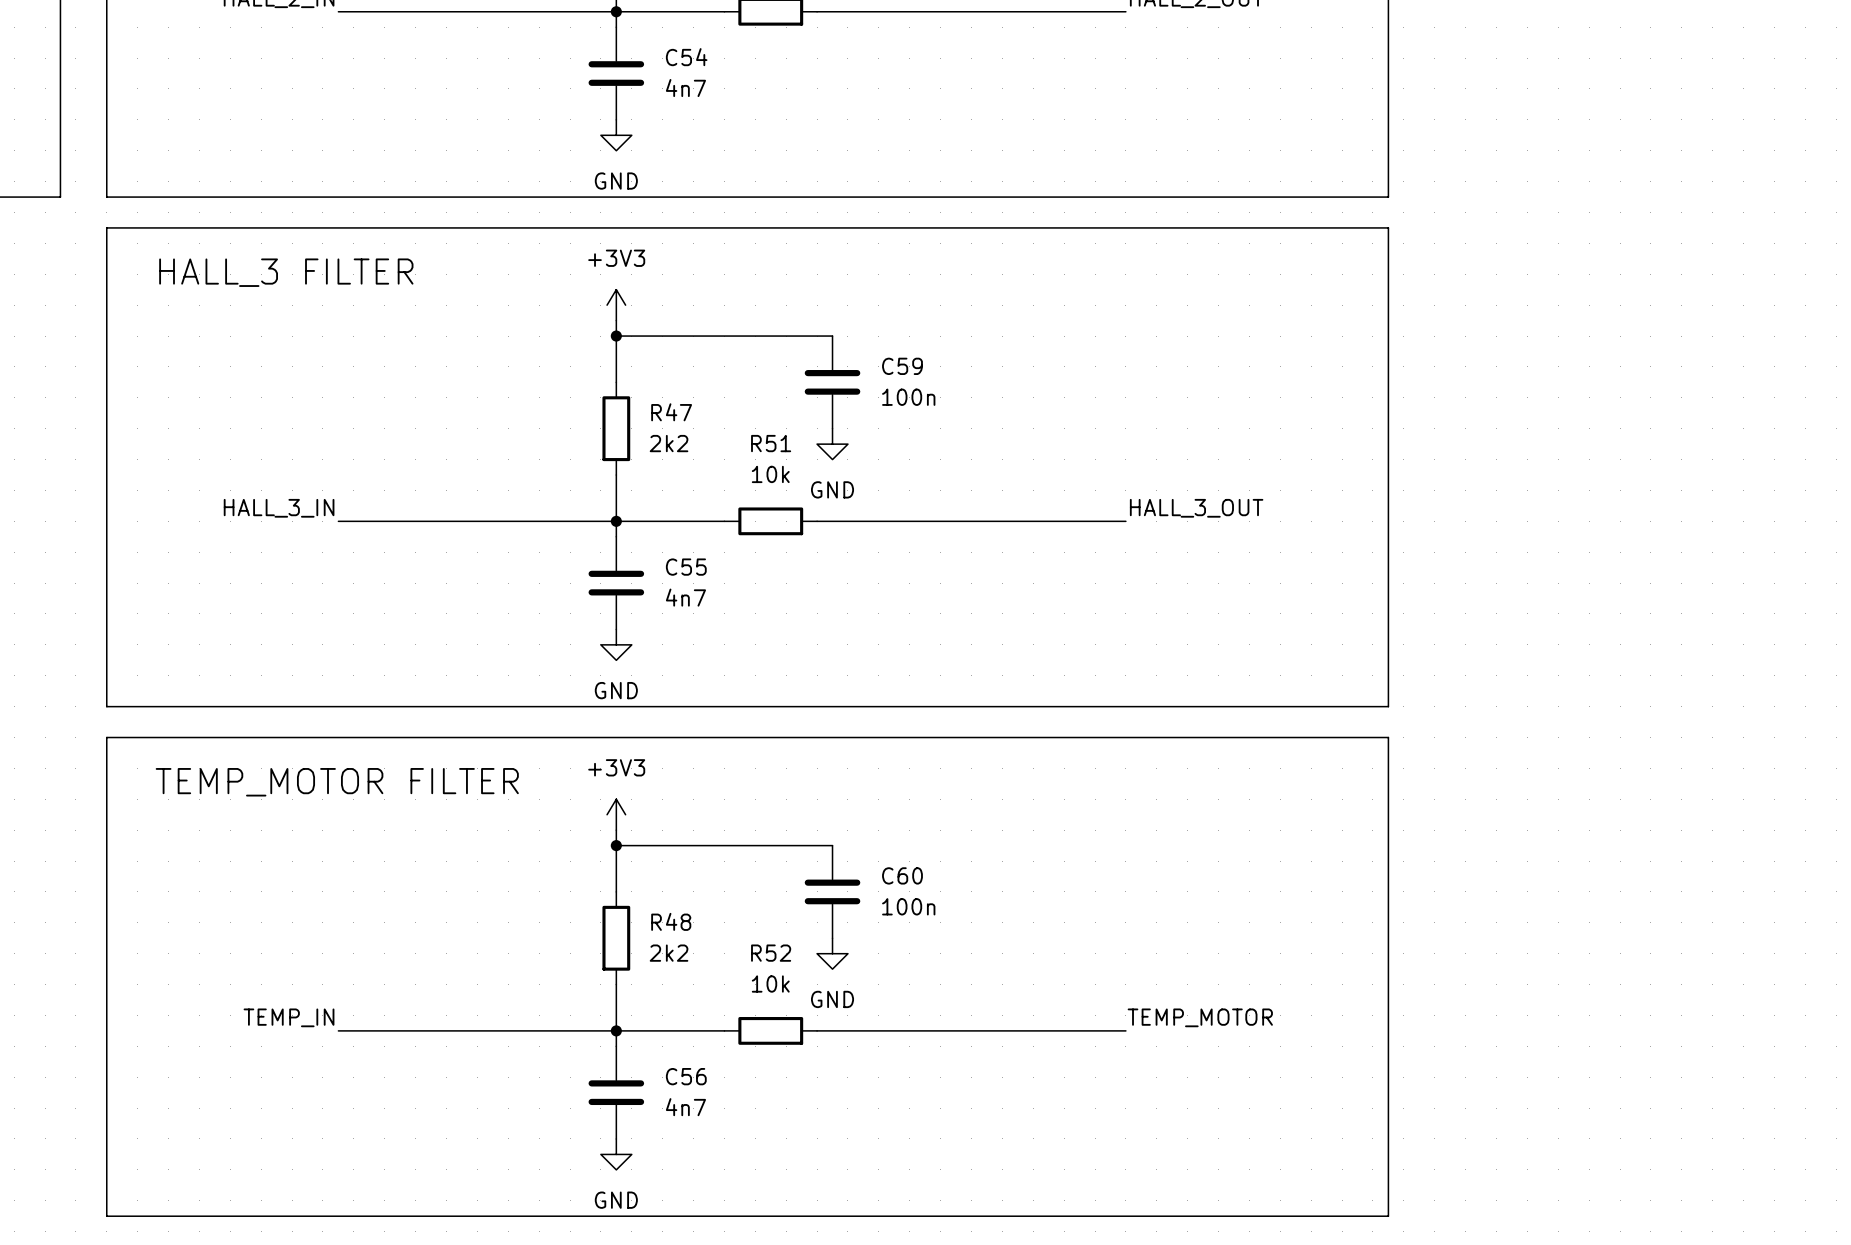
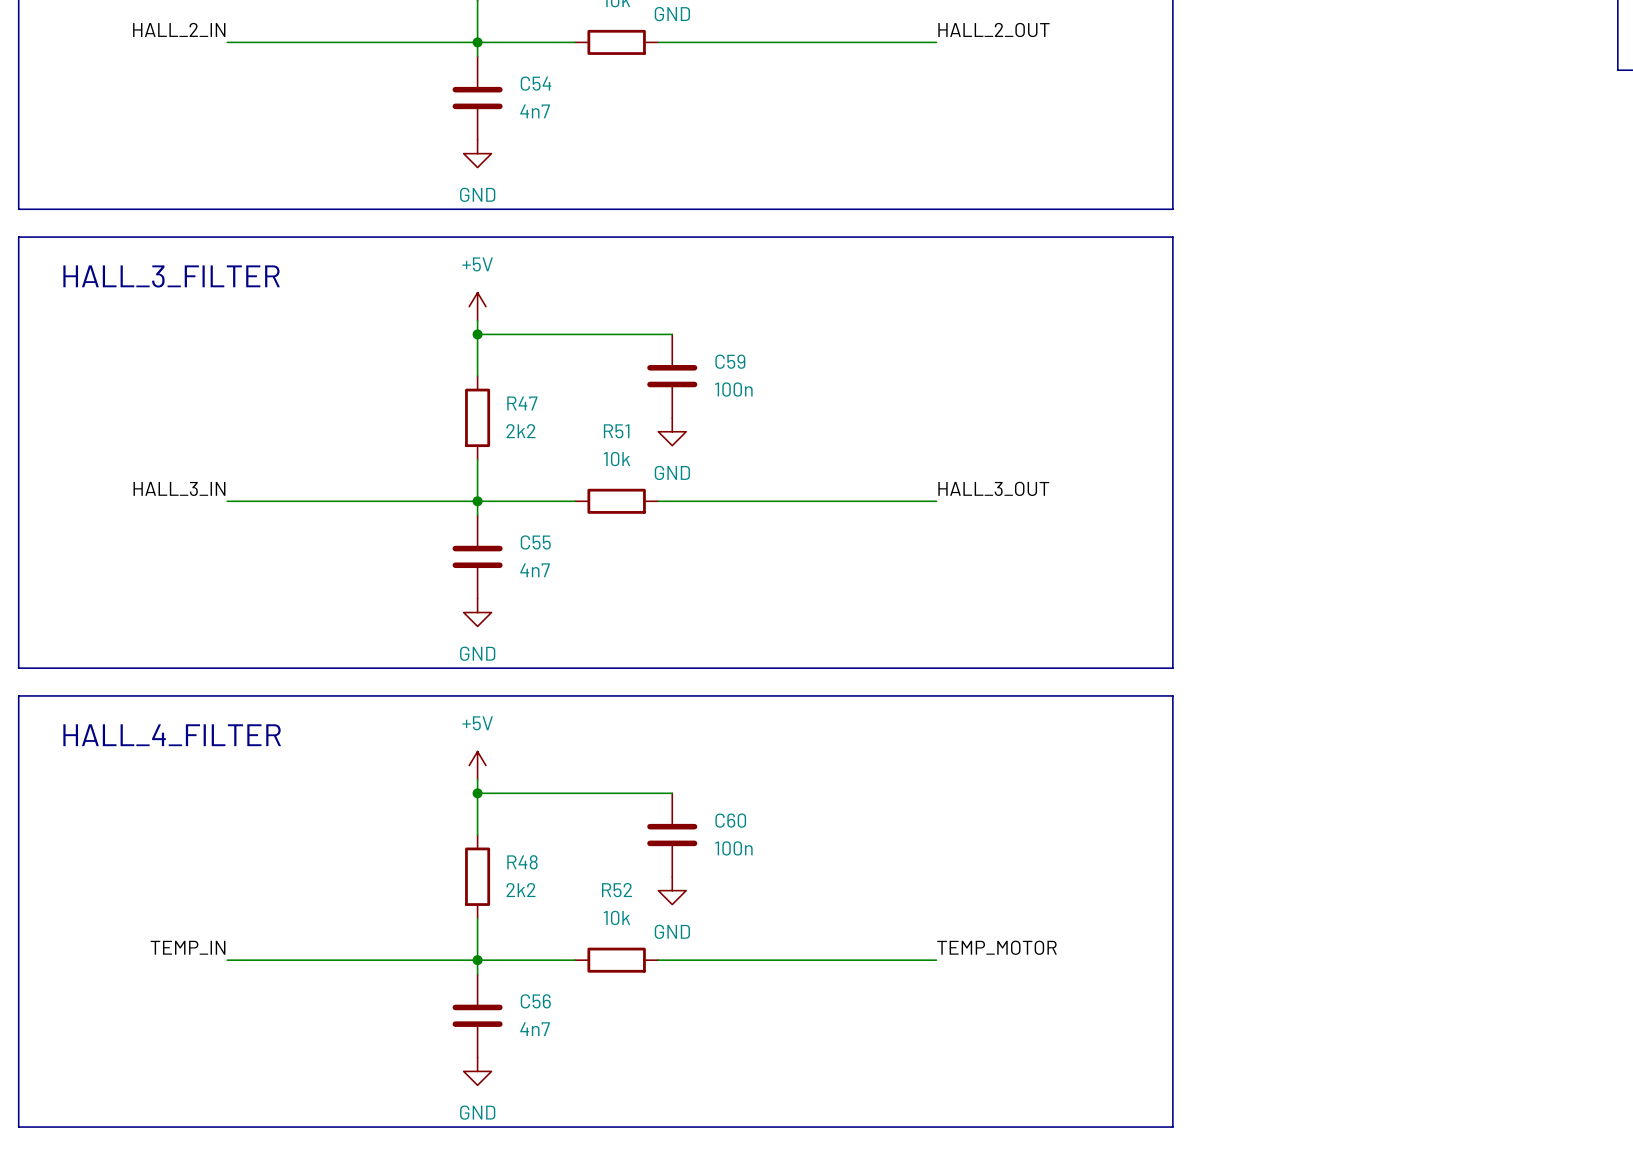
text: HALL_3 FILTER (286, 272) -> HALL_3_FILTER (171, 276)
power symbol: +3V3 (616, 305) -> +5V (477, 306)
text: TEMP_MOTOR FILTER (337, 782) -> HALL_4_FILTER (172, 735)
power symbol: +3V3 (616, 814) -> +5V (477, 765)

